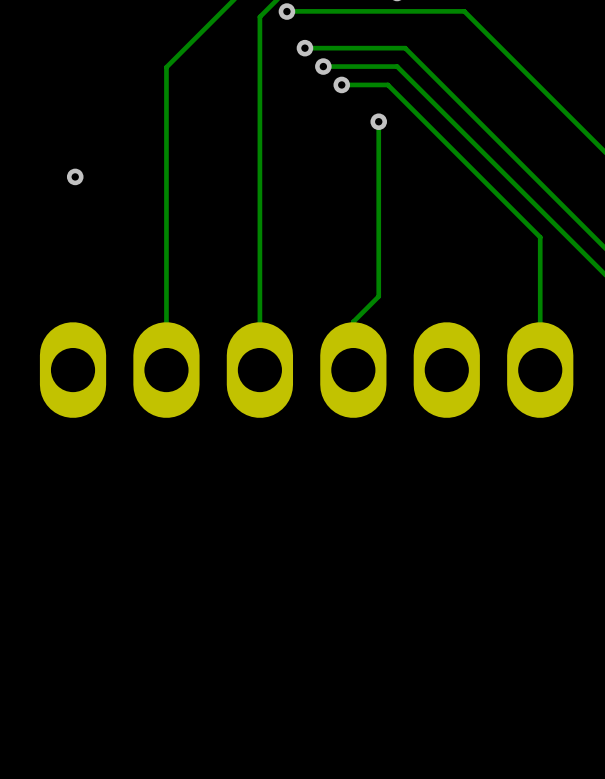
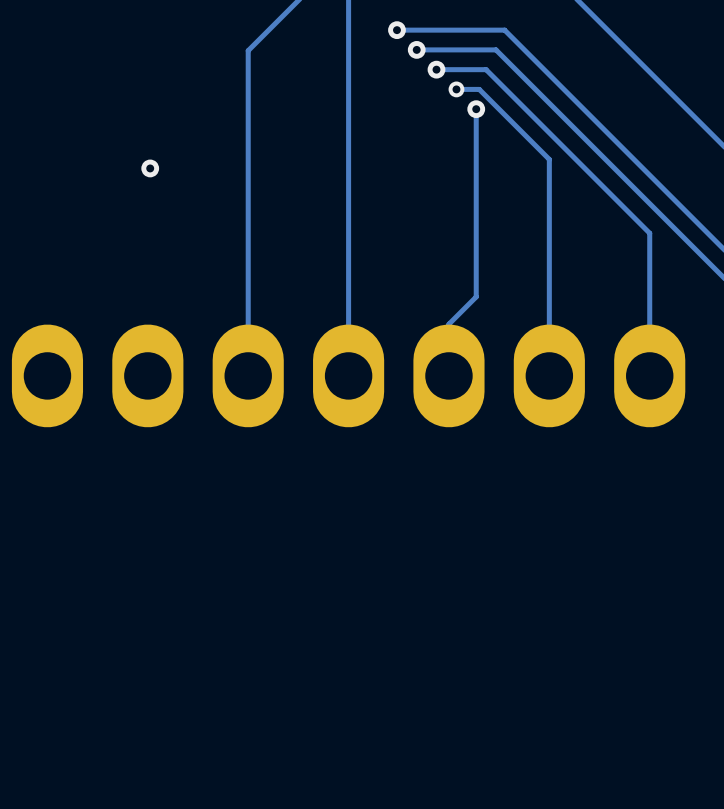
track: none -> (456, 89) (479, 89) (549, 159) (549, 375)
via: none -> (456, 89)

